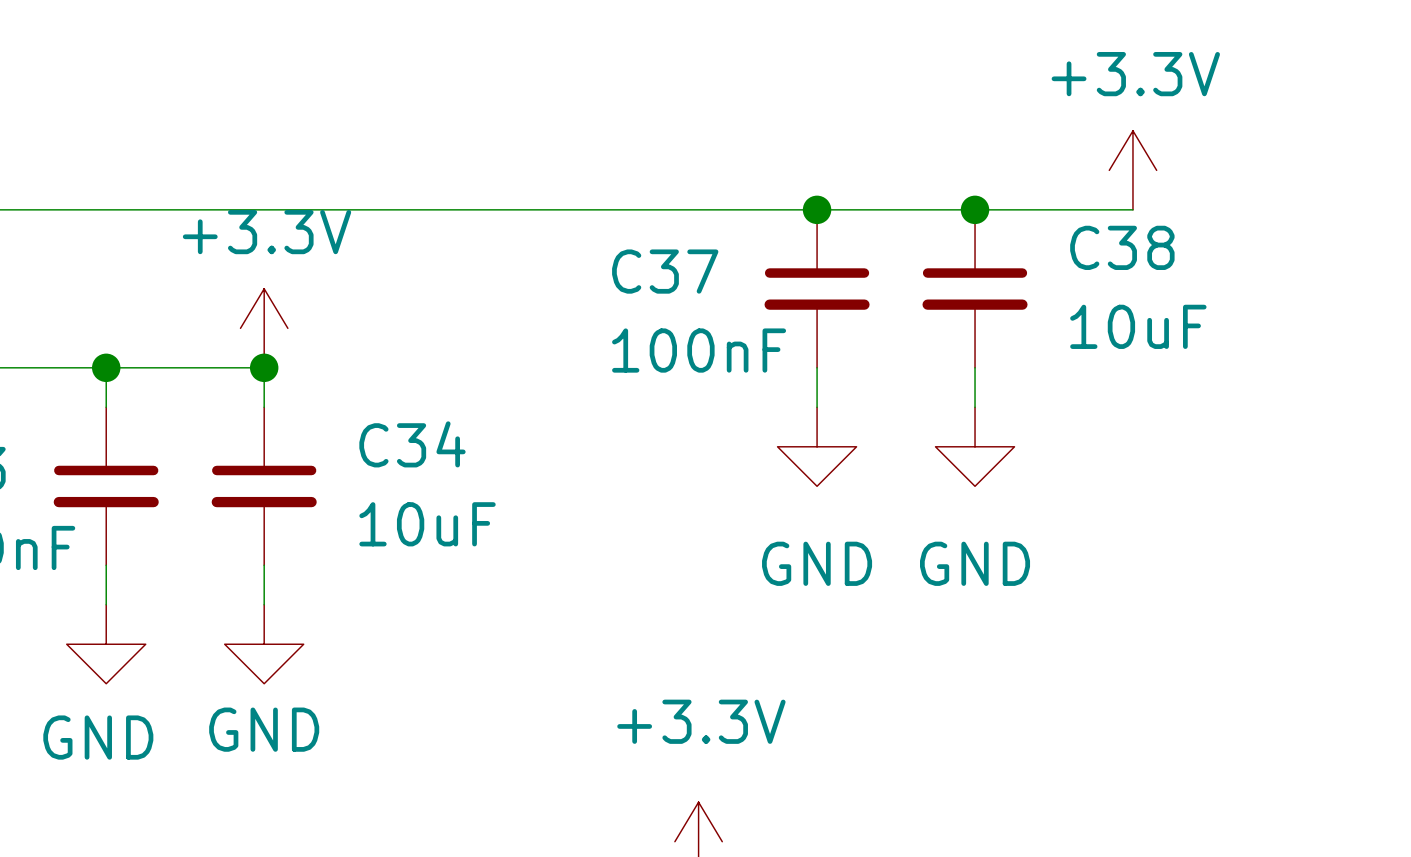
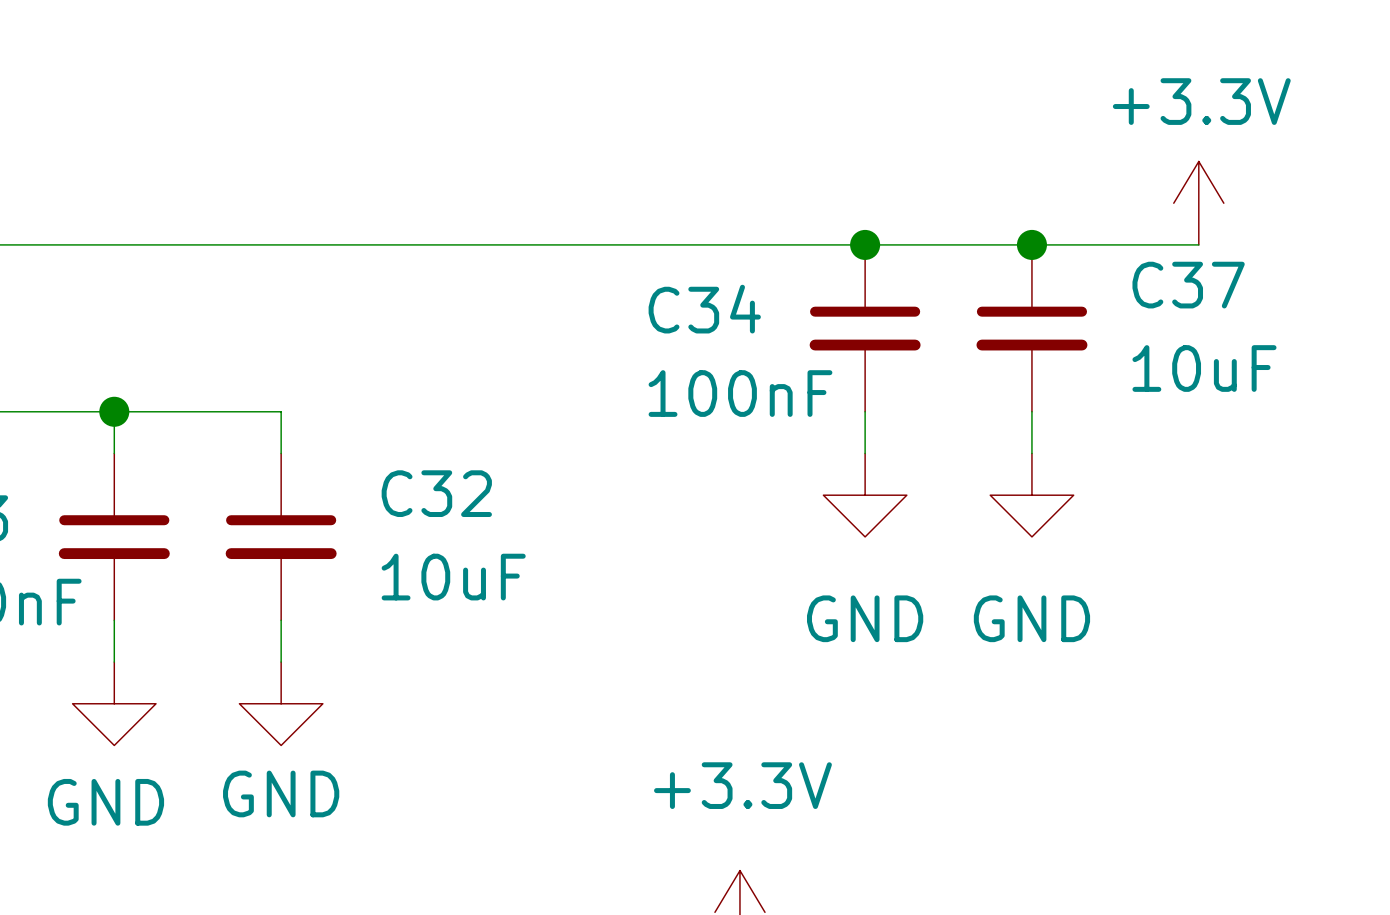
C38 name: C38 (1122, 247) -> C37 (1188, 285)
C37 name: C37 (665, 271) -> C34 (704, 309)
power symbol: +3.3V (264, 328) -> none
junction: (264, 367) -> none
C34 name: C34 (412, 444) -> C32 (436, 493)

